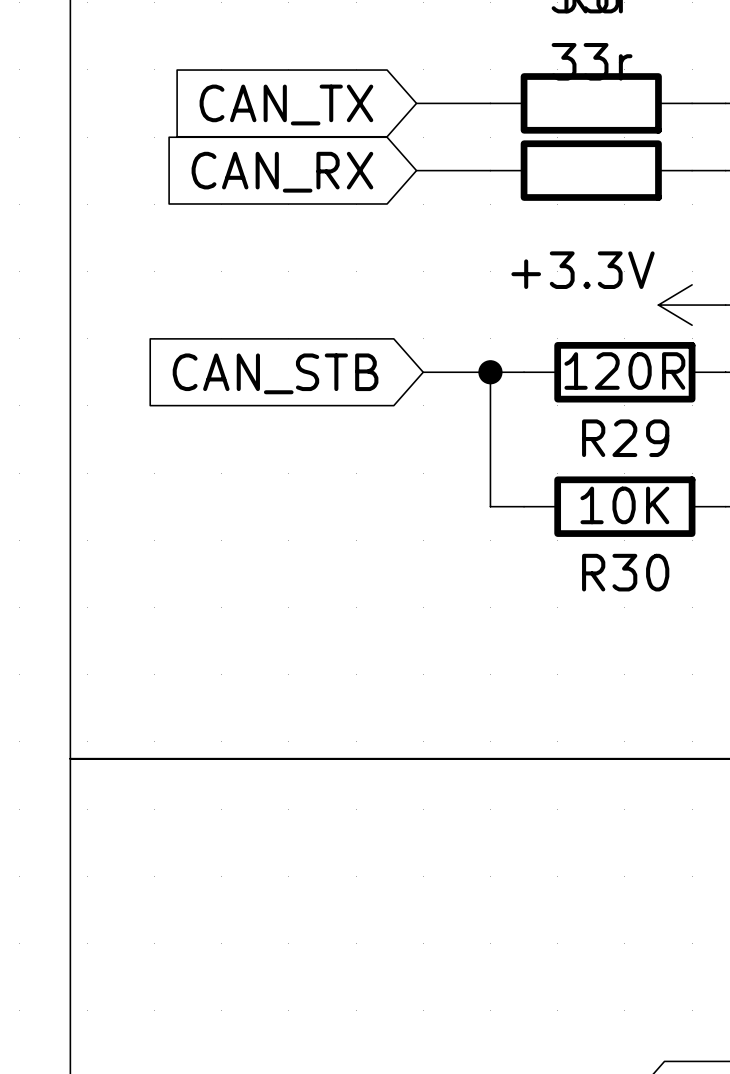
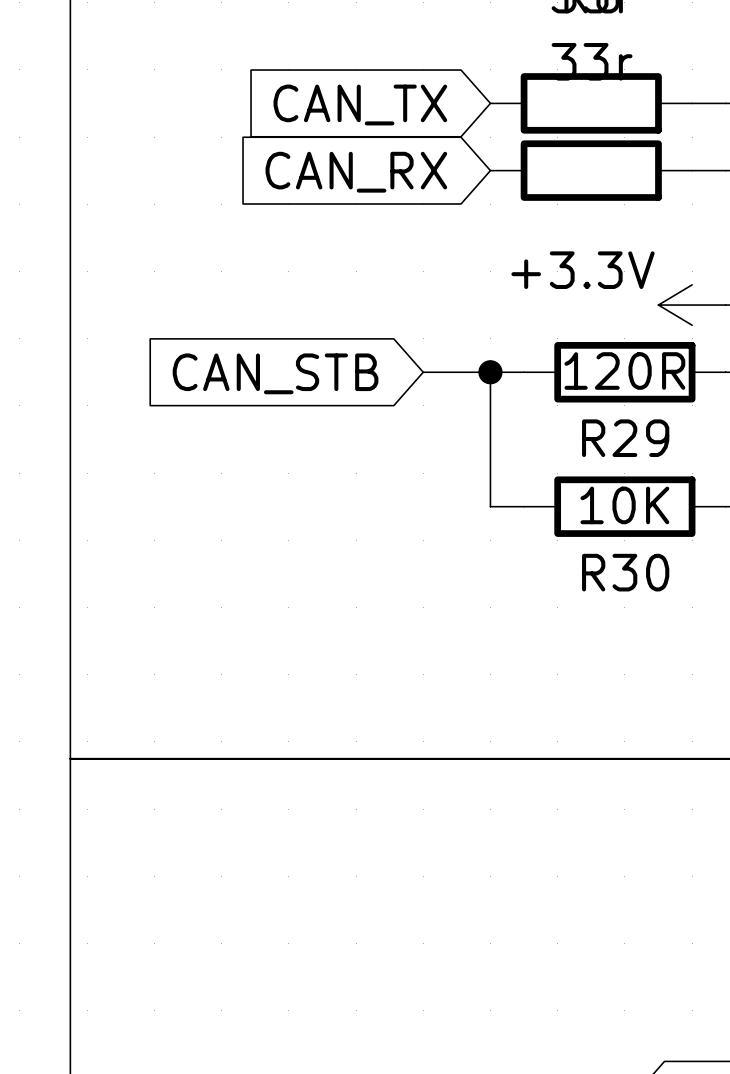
wire: (416, 103) (490, 103) -> none
global label position: CAN_TX (286, 105) -> CAN_TX (360, 105)
wire: (416, 170) (490, 170) -> none
global label position: CAN_RX (282, 172) -> CAN_RX (356, 172)

